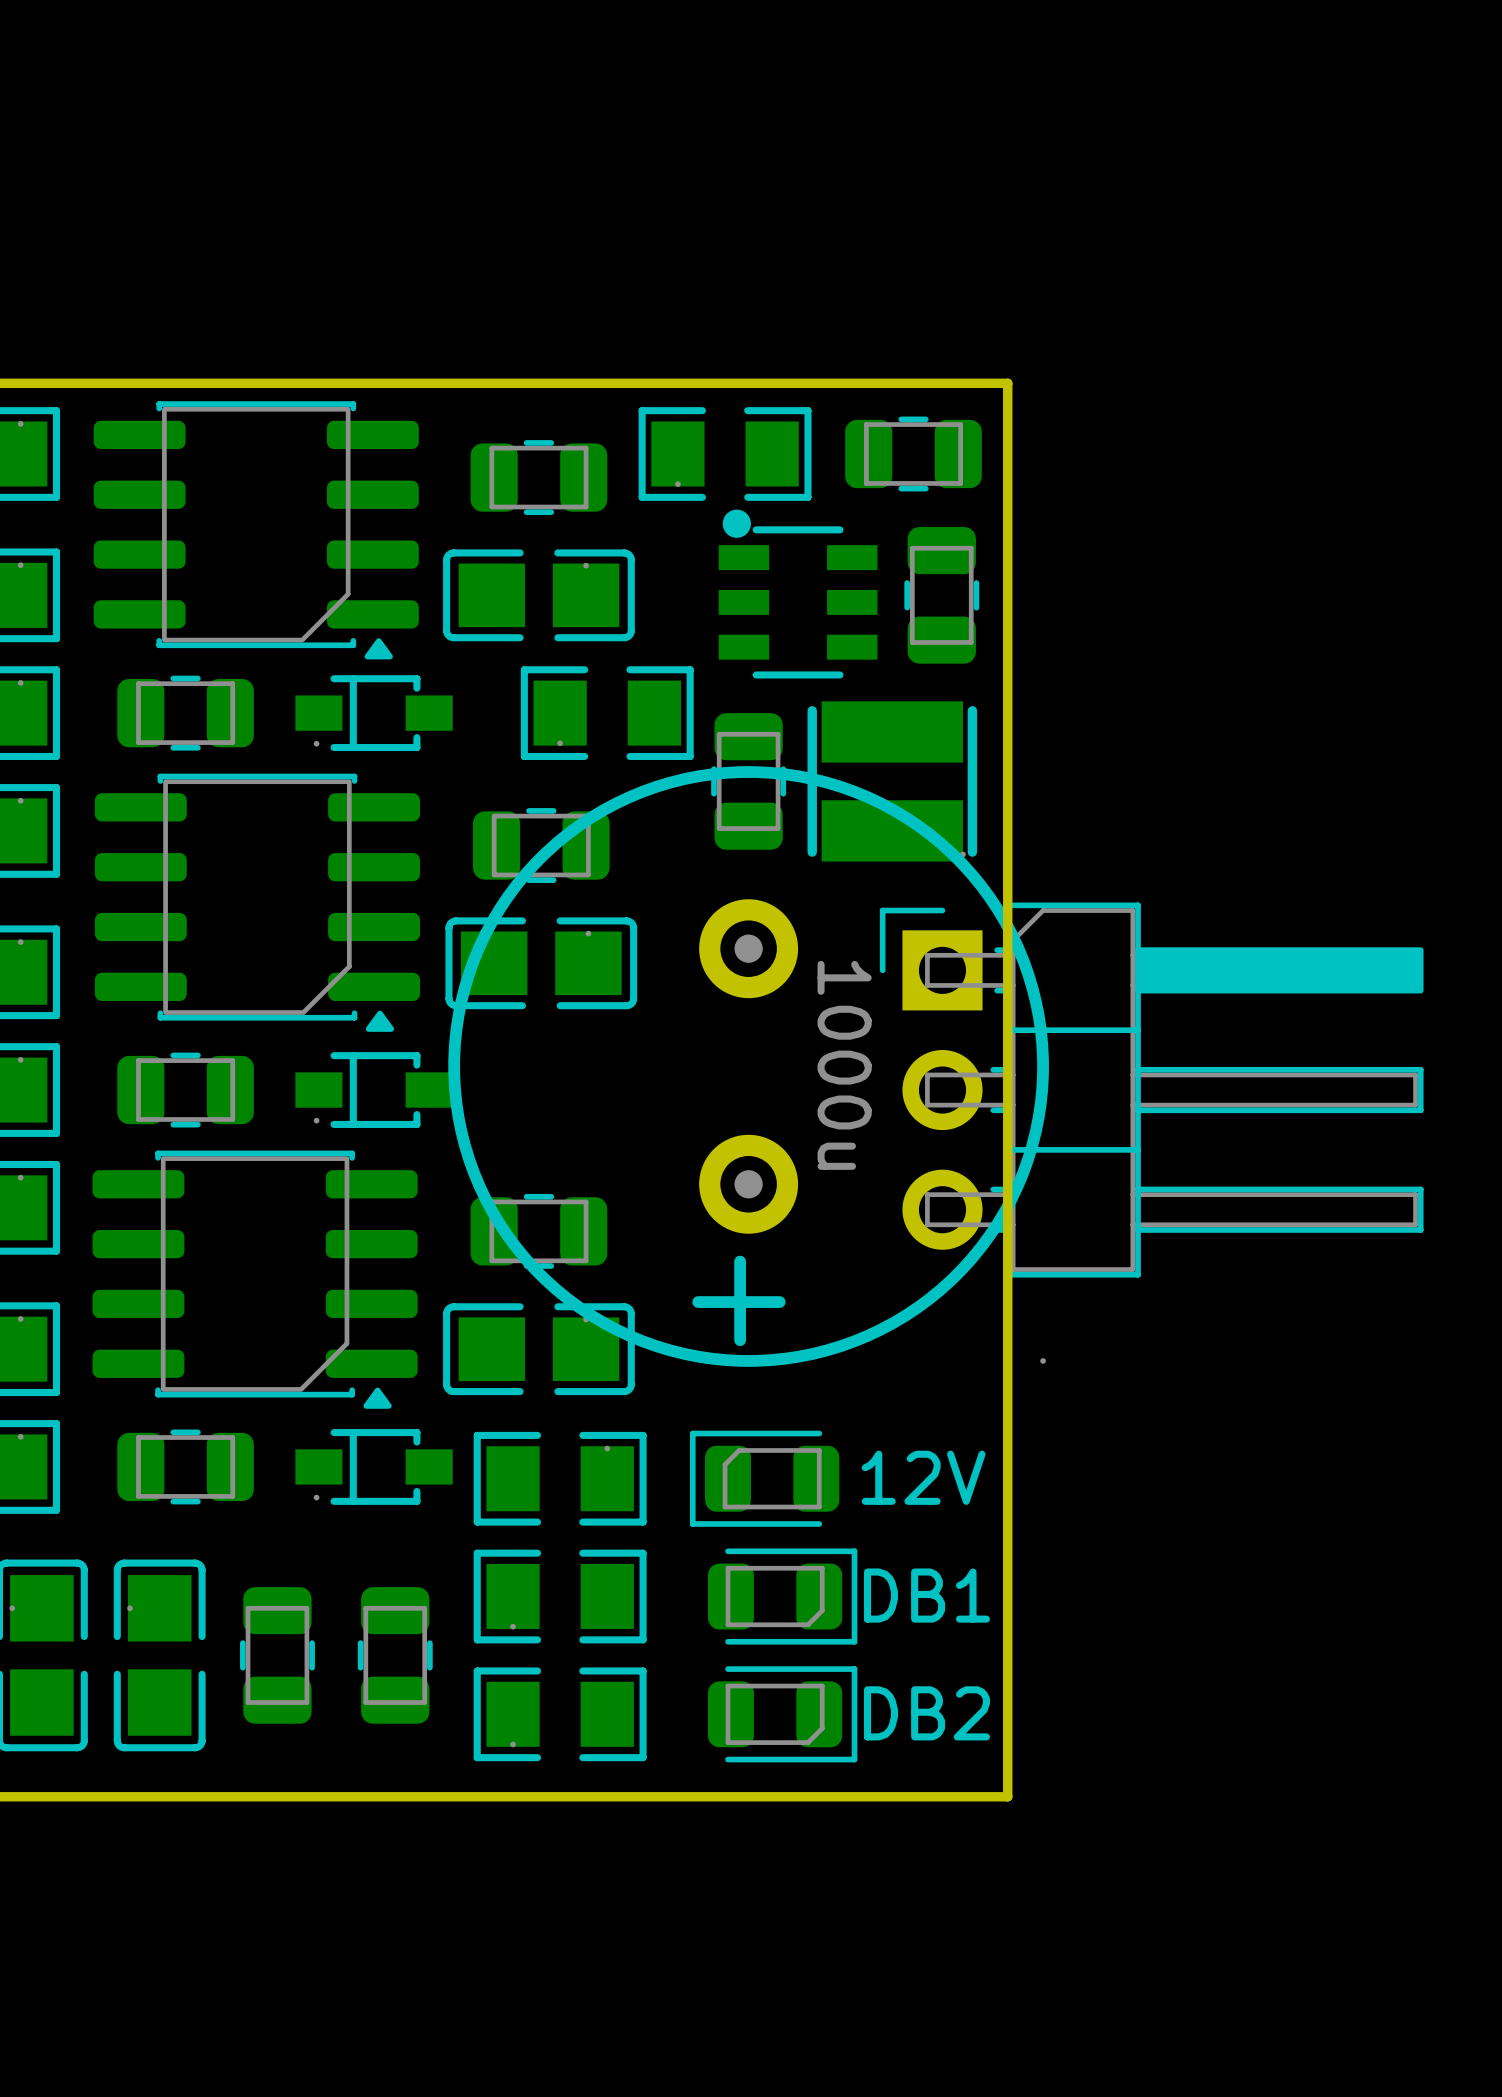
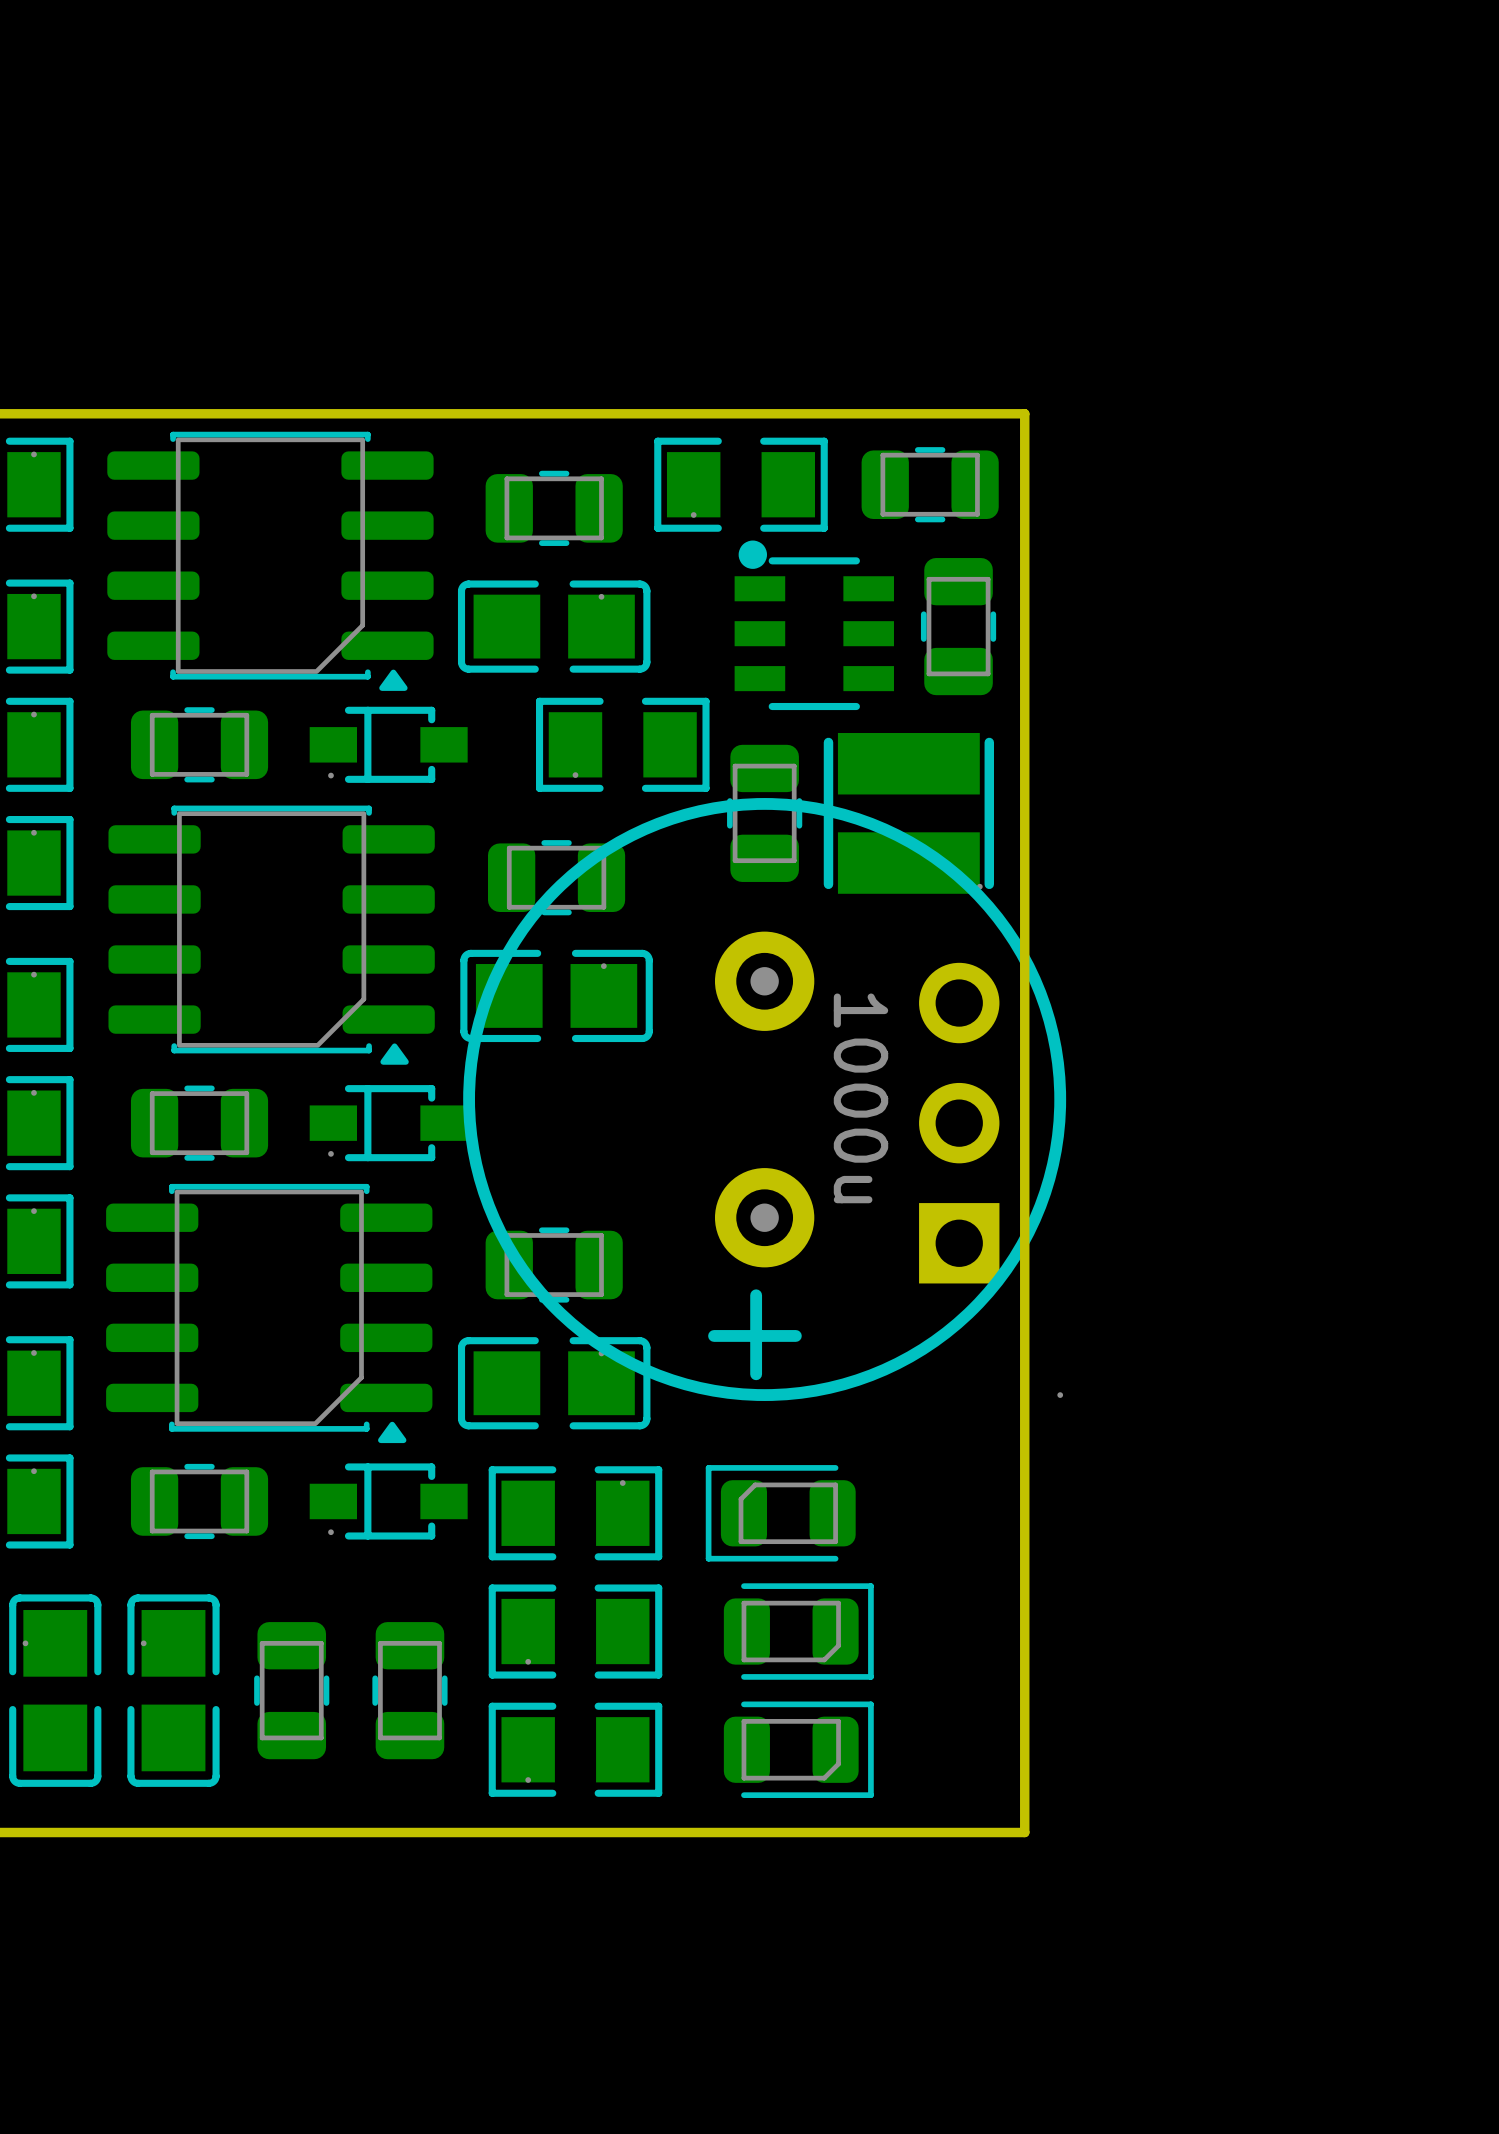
part side: bottom (1151, 1090) -> top (959, 1123)
text: 12V (923, 1477) -> none
text: DB1 (927, 1595) -> none
text: DB2 (927, 1713) -> none

